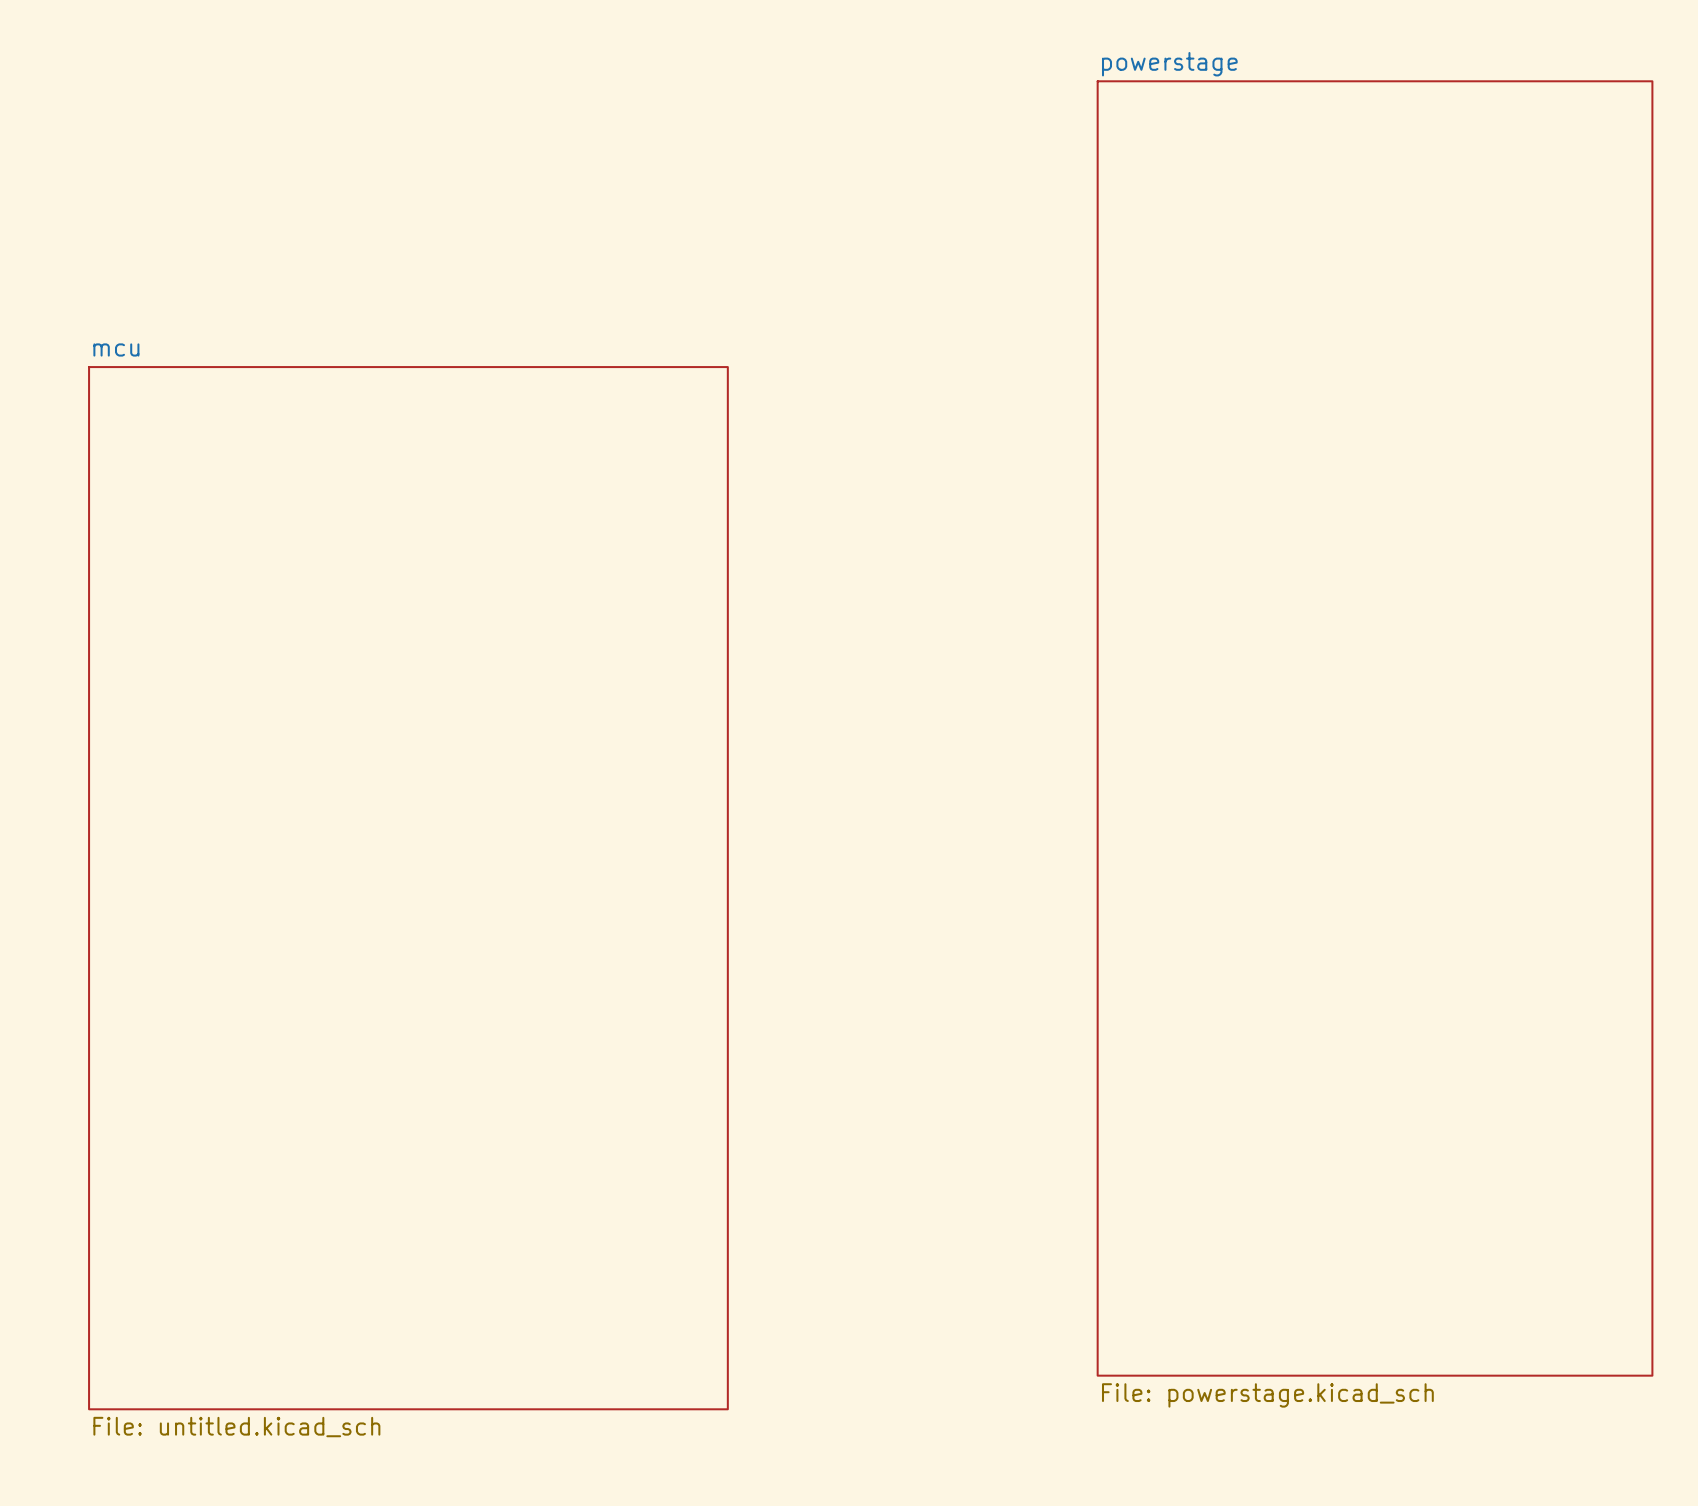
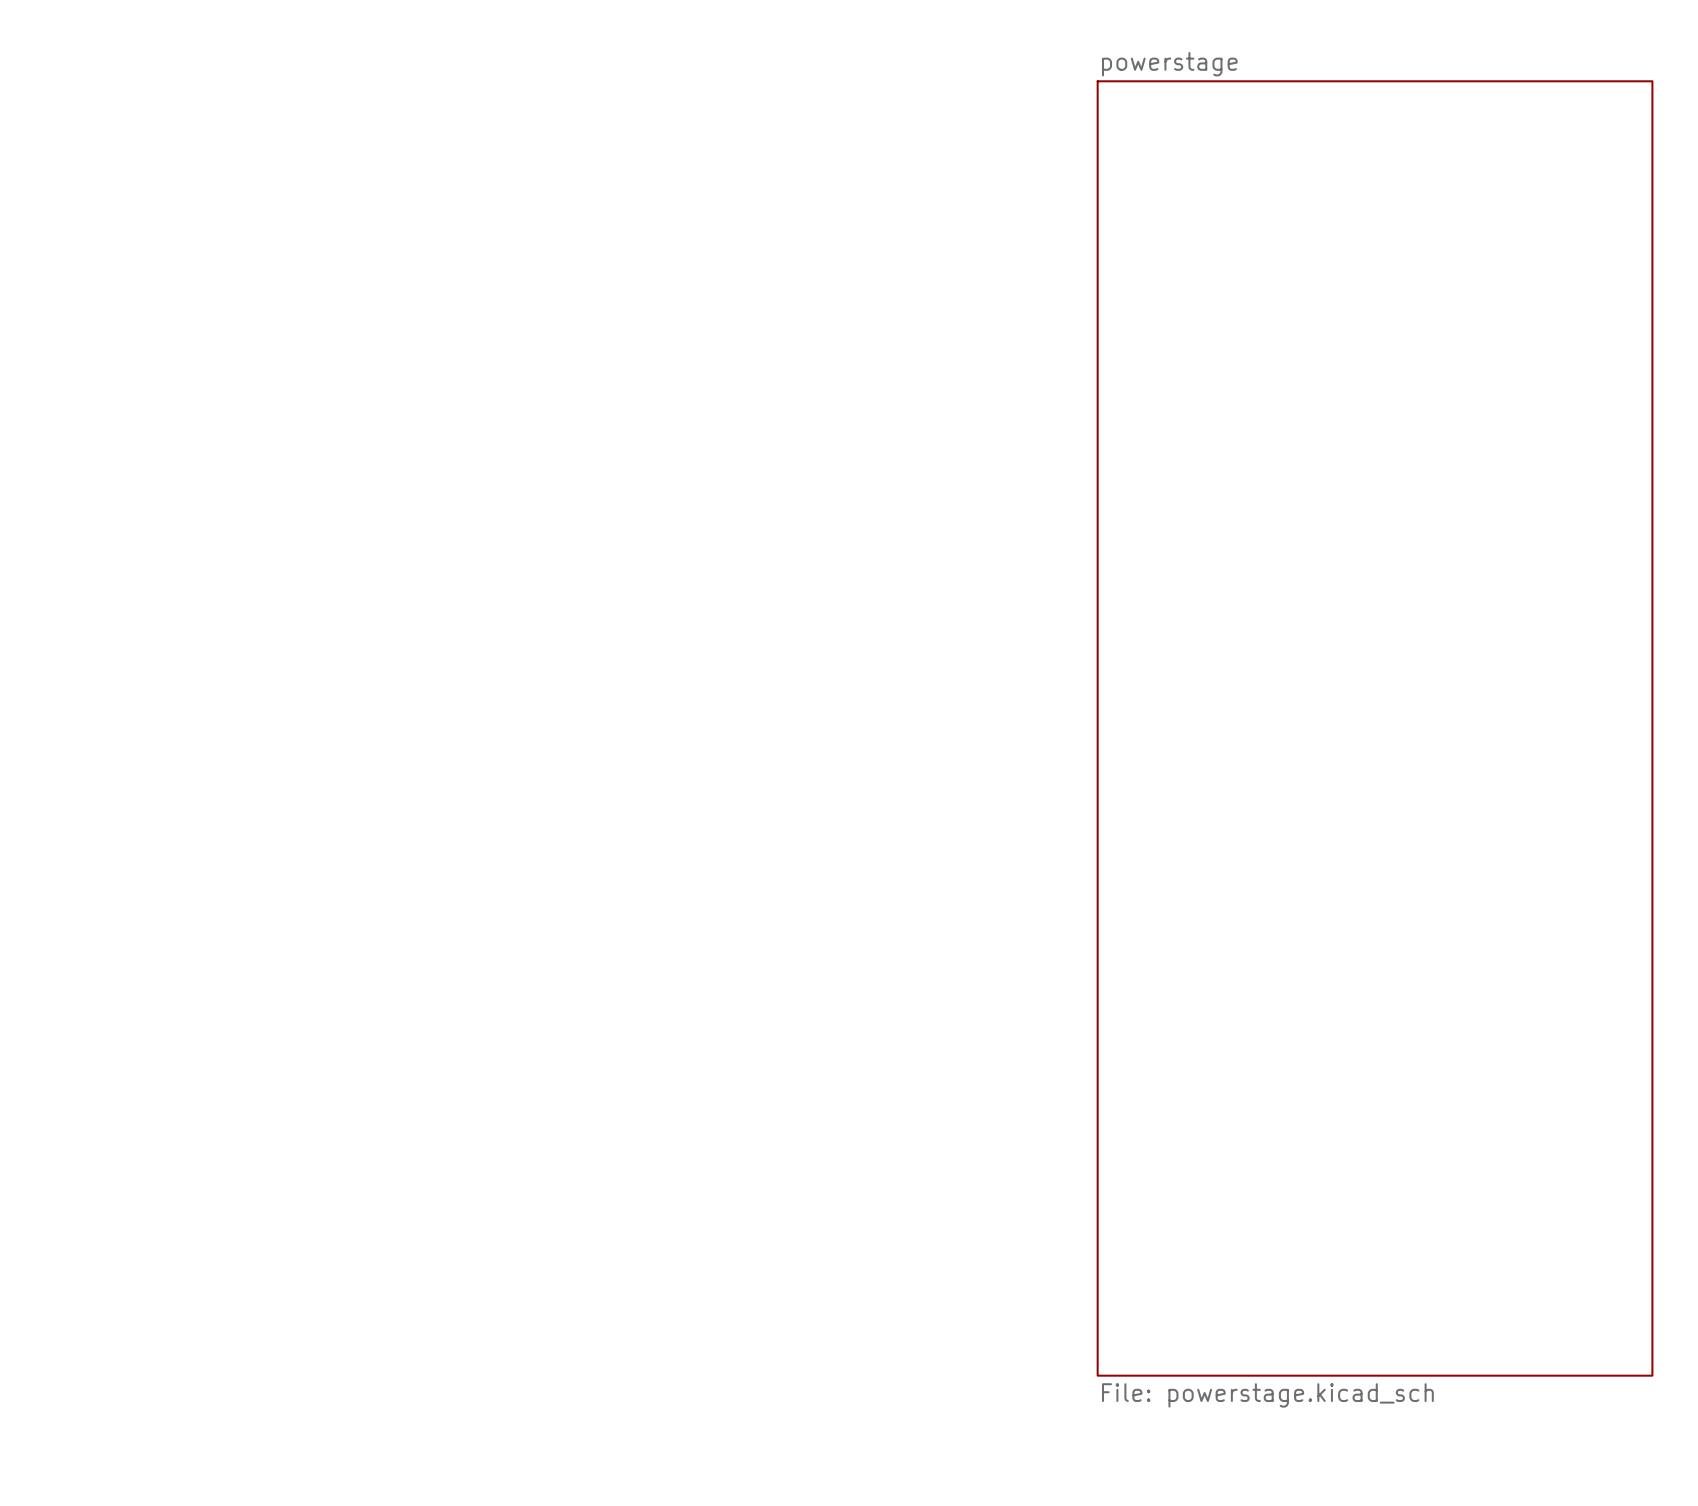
sheet mcu: File: untitled.kicad_sch (408, 888) -> none

